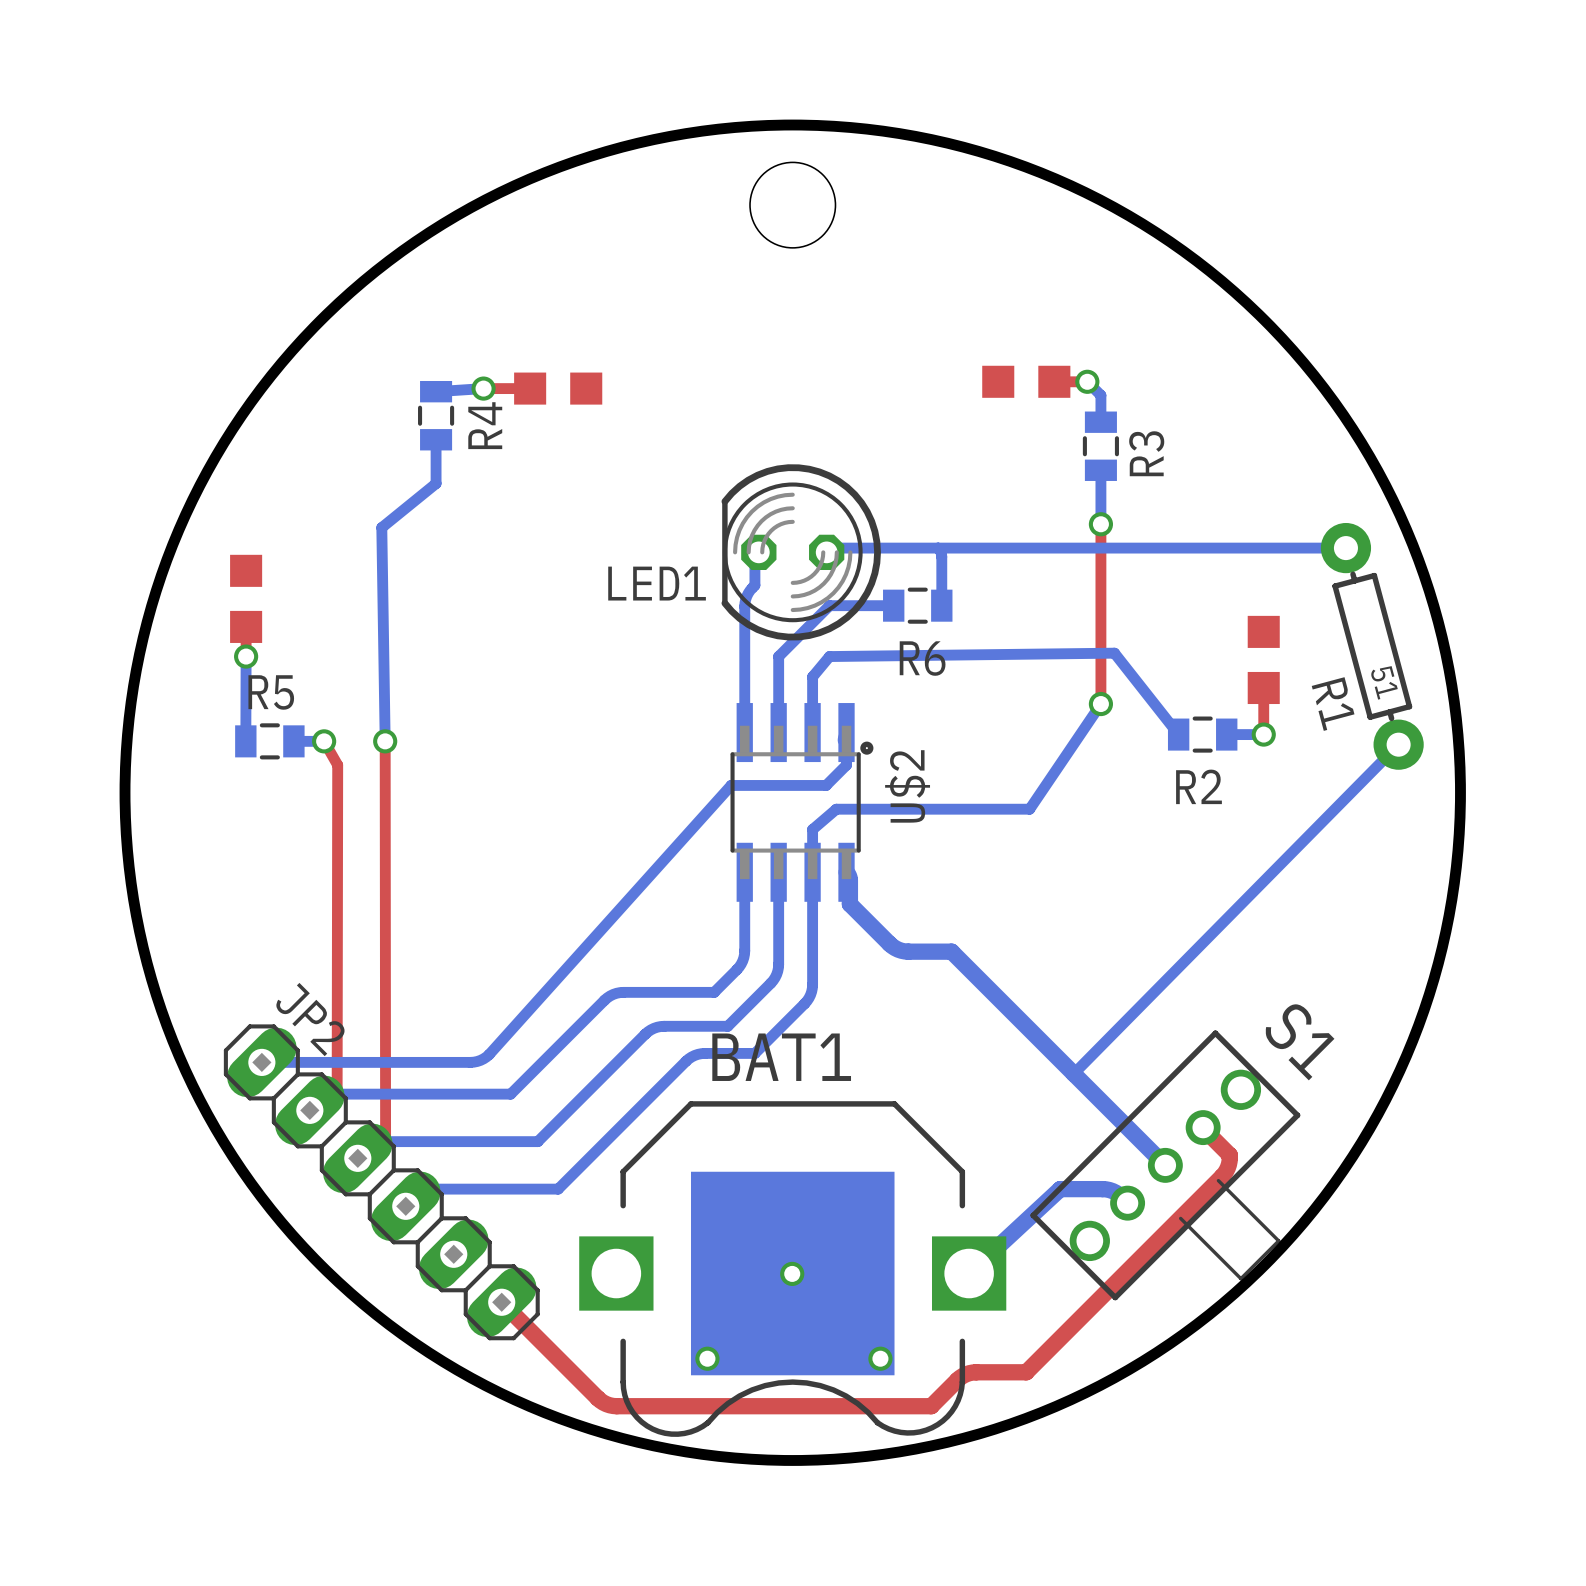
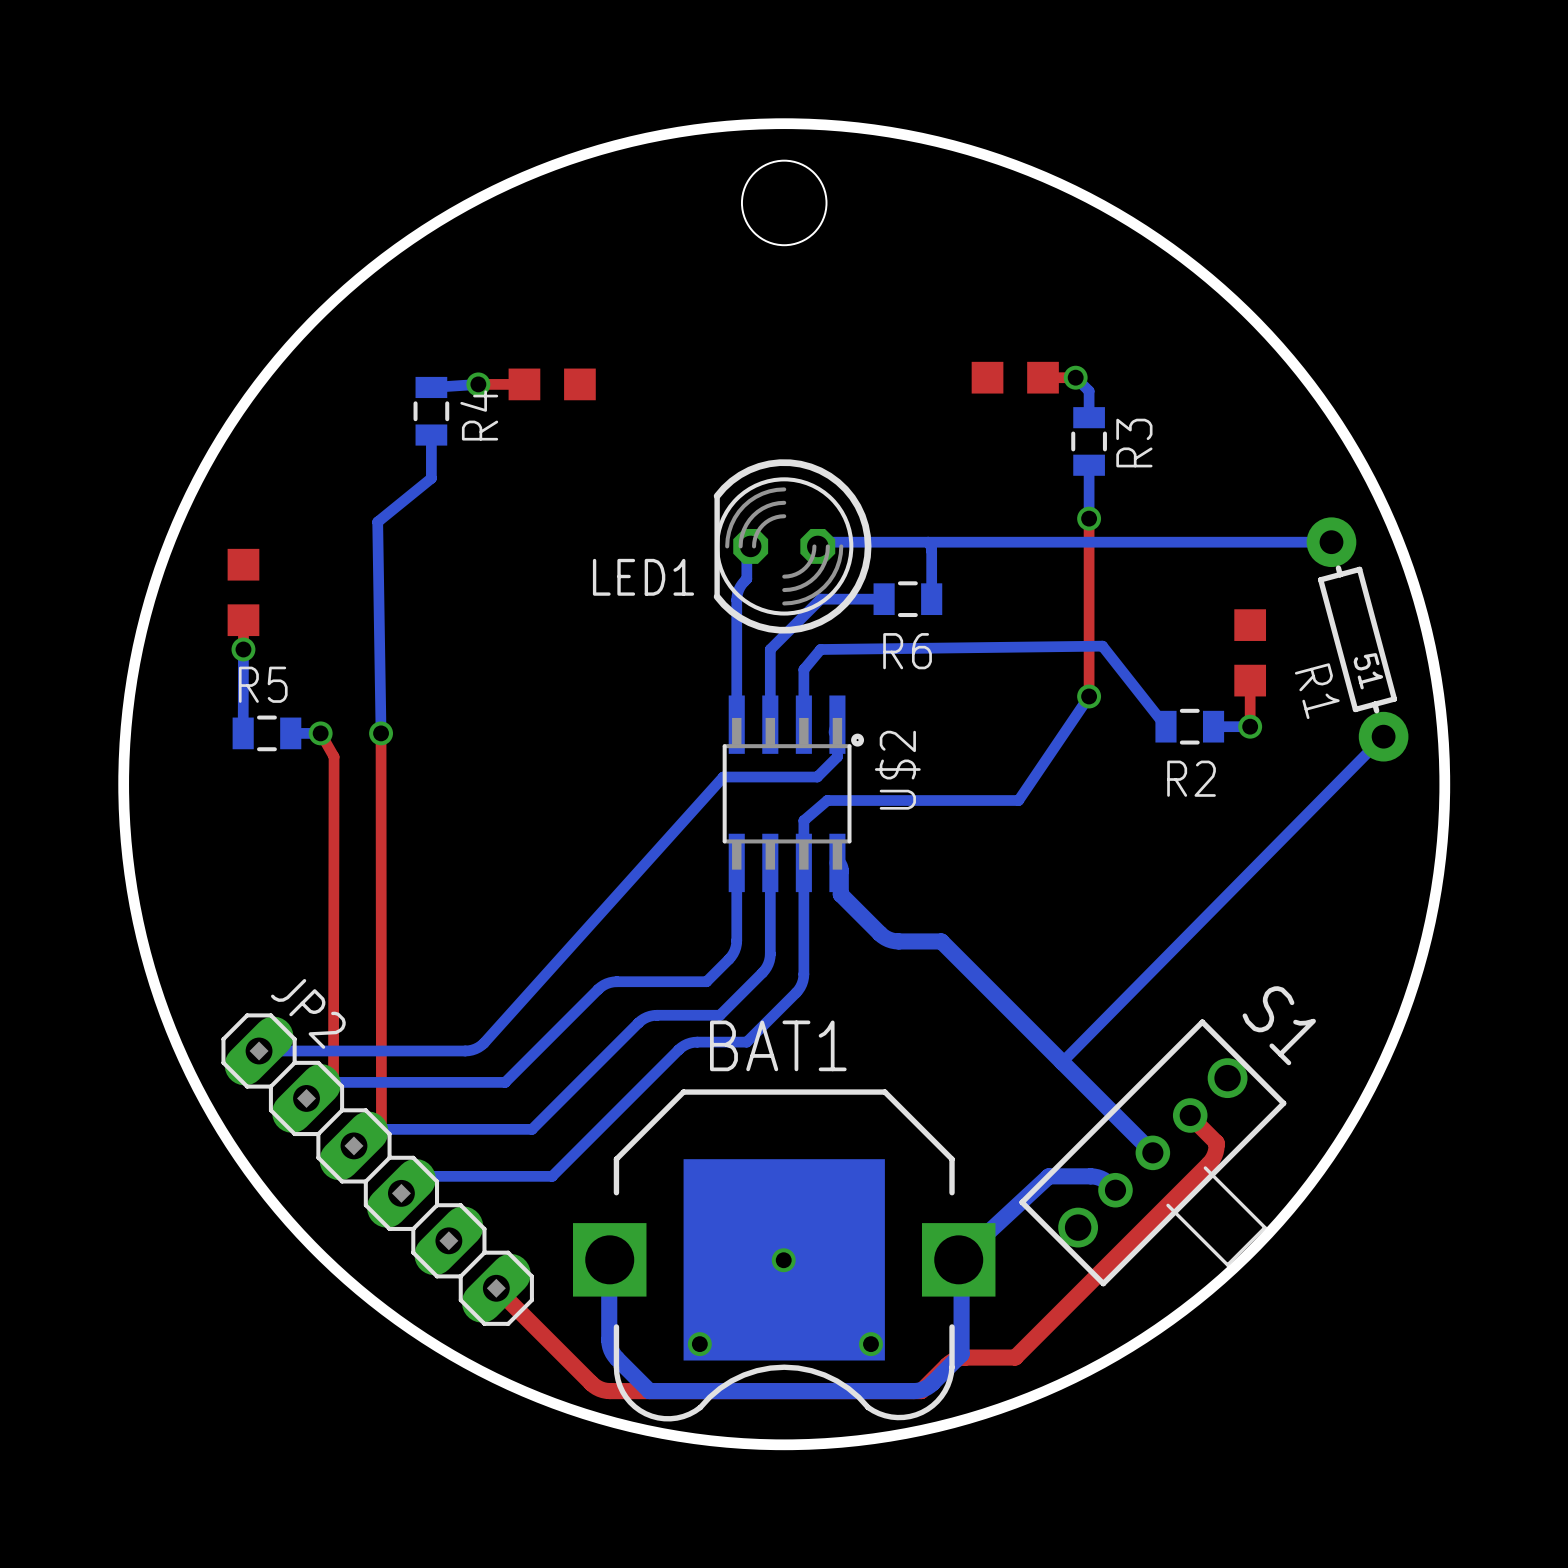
bottom track: none -> (609, 1263) (610, 1346) (616, 1358) (649, 1391) (913, 1391) (923, 1389) (932, 1383) (961, 1354) (961, 1280)

